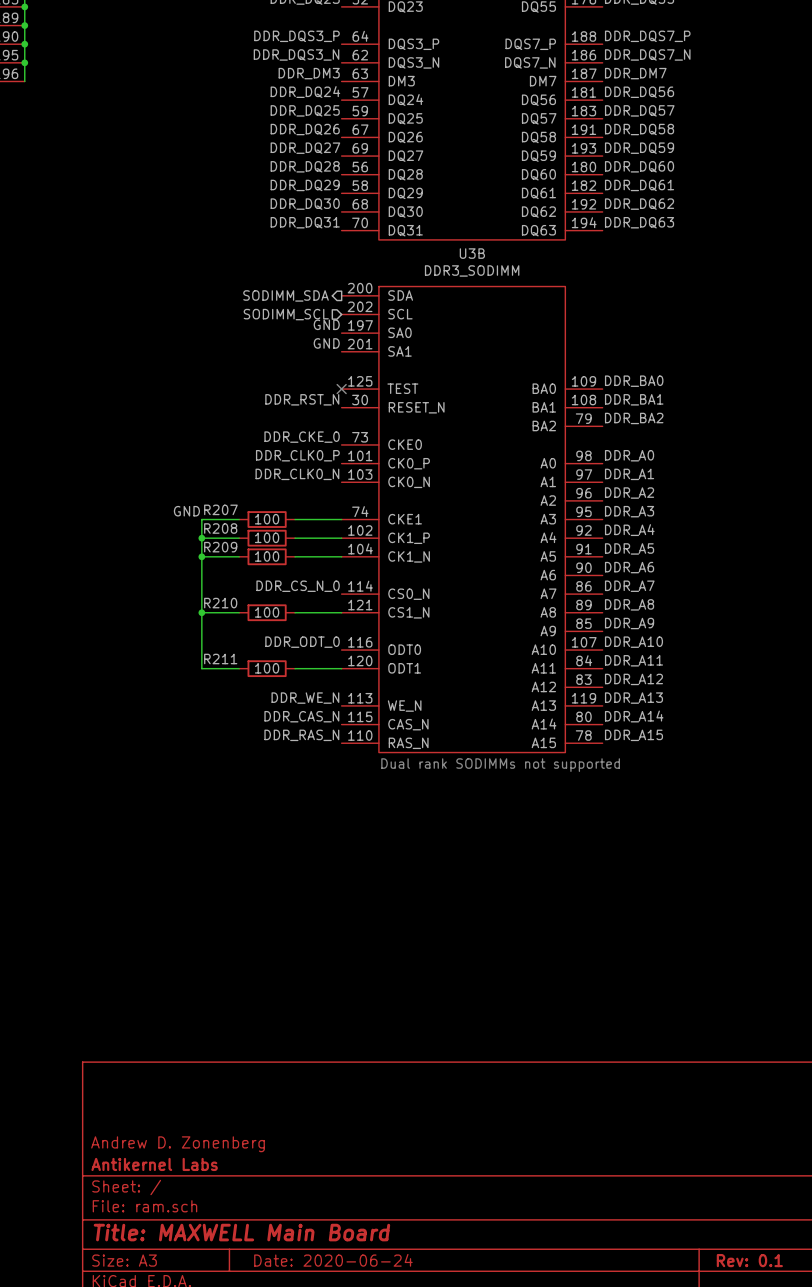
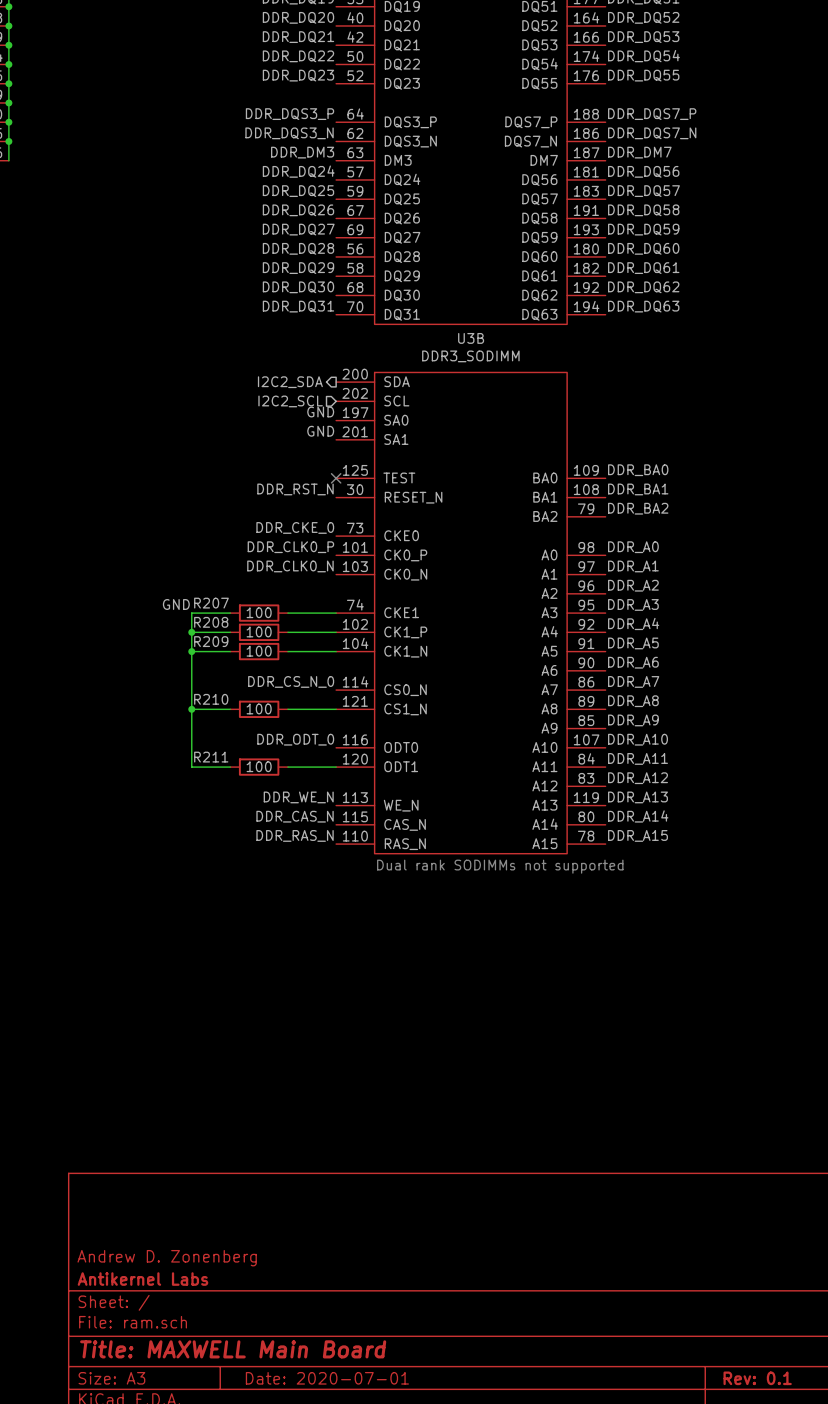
hierarchical label: SODIMM_SDA (286, 295) -> I2C2_SDA (290, 382)
hierarchical label: SODIMM_SCL (286, 314) -> I2C2_SCL (290, 401)
title block: Date: 2020-06-24 (333, 1260) -> Date: 2020-07-01 (327, 1378)

